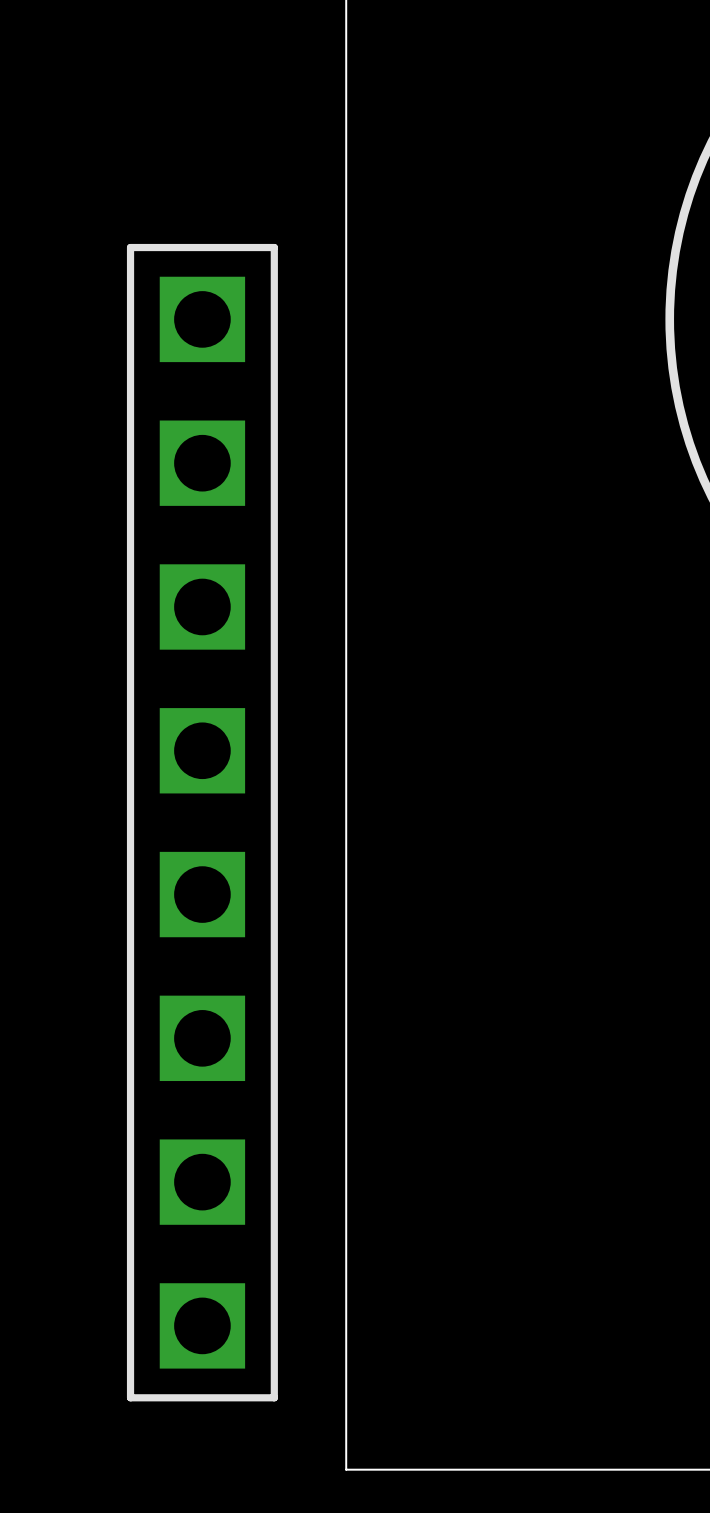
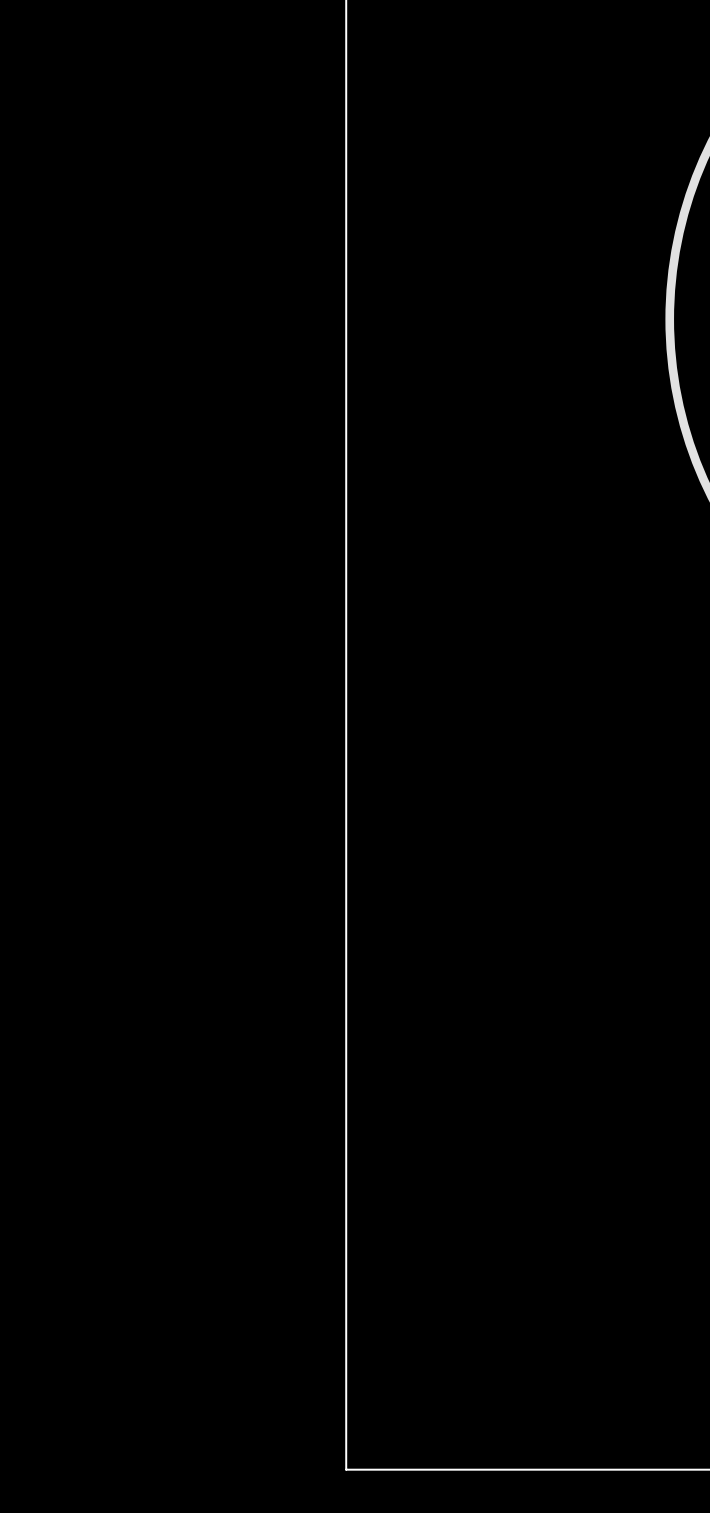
part: (202, 822) -> none

